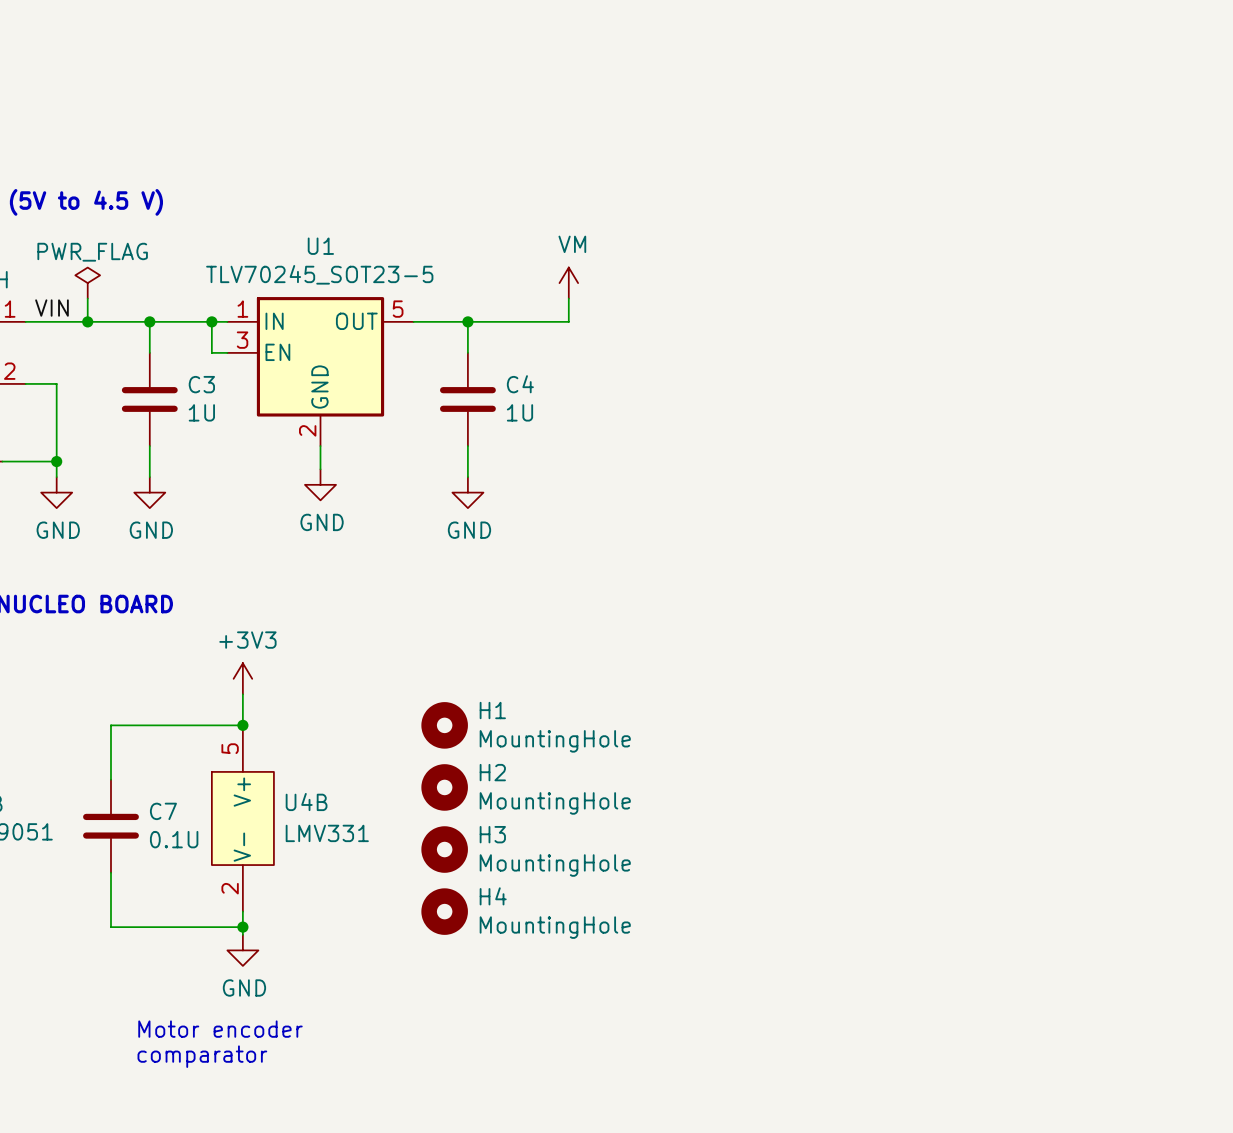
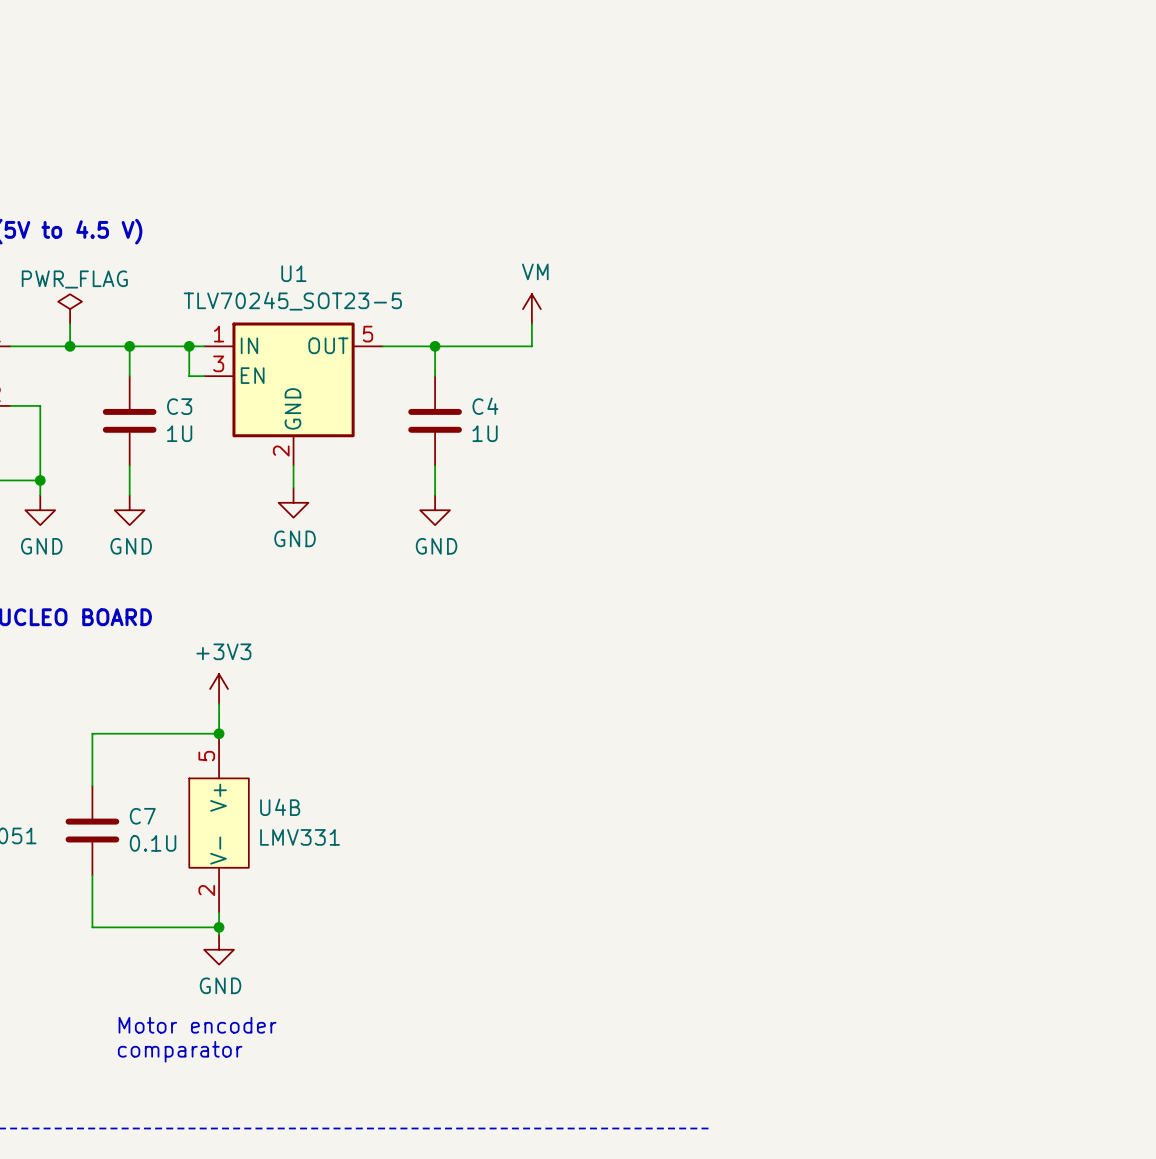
label: VIN (51, 308) -> none
H1: MountingHole (444, 725) -> none
H2: MountingHole (444, 787) -> none
H3: MountingHole (444, 849) -> none
H4: MountingHole (444, 911) -> none

